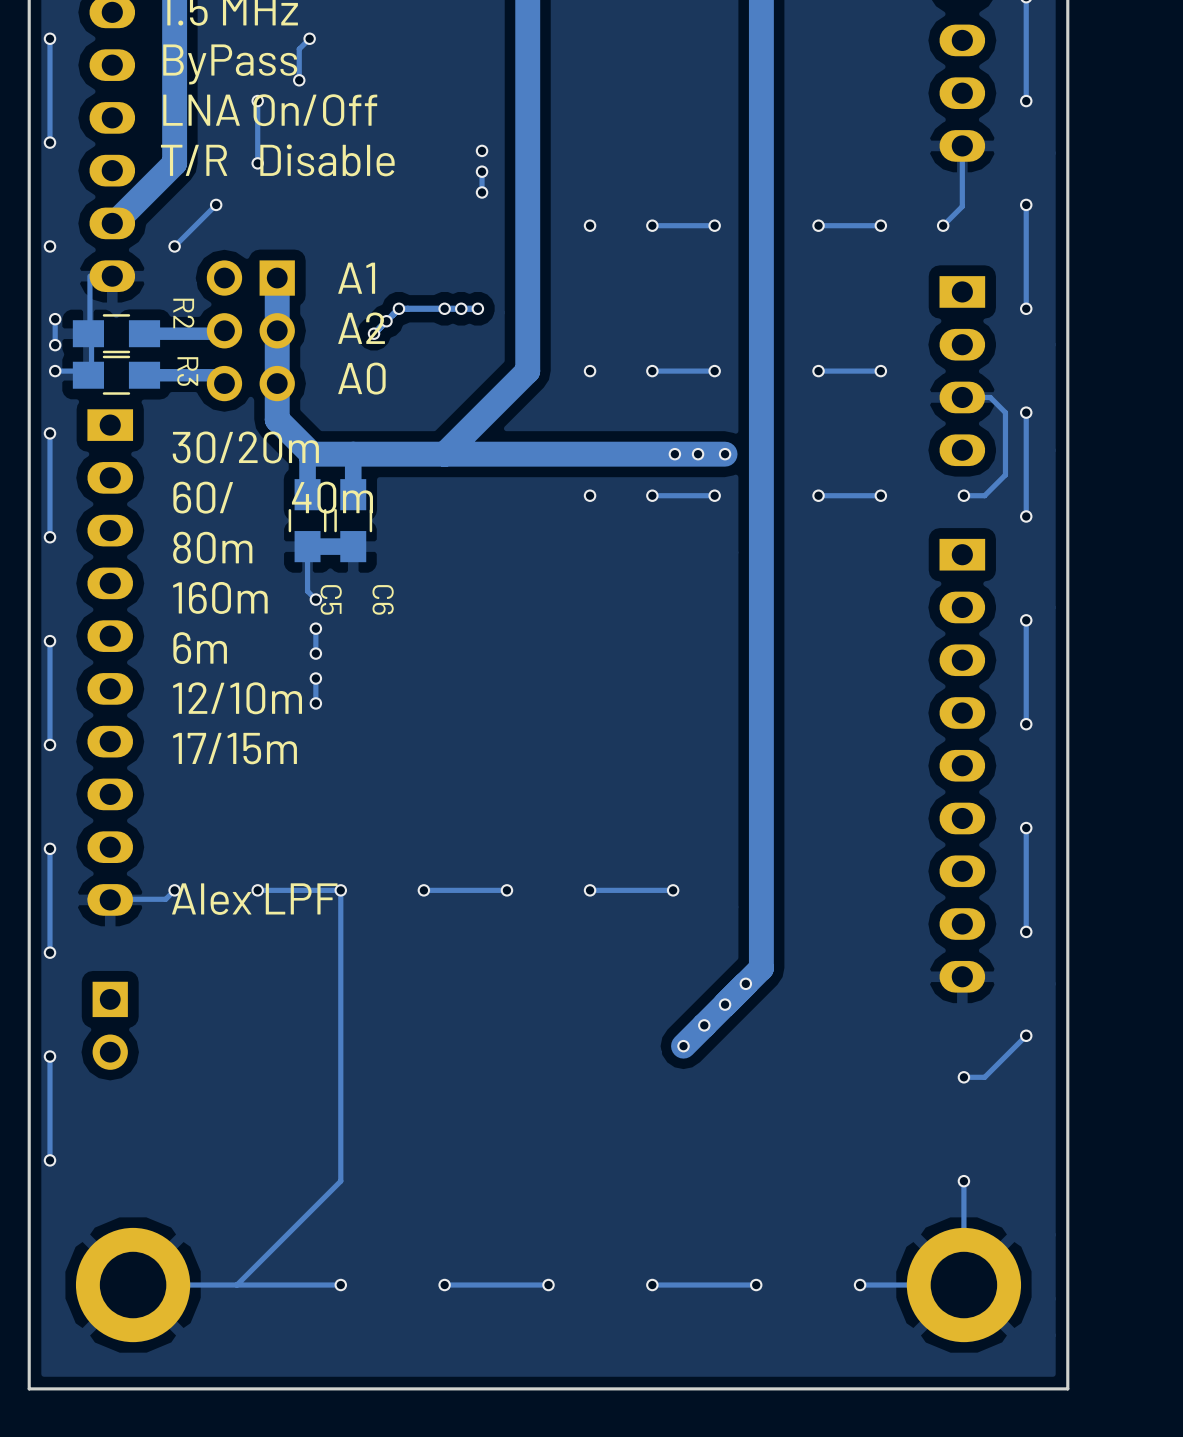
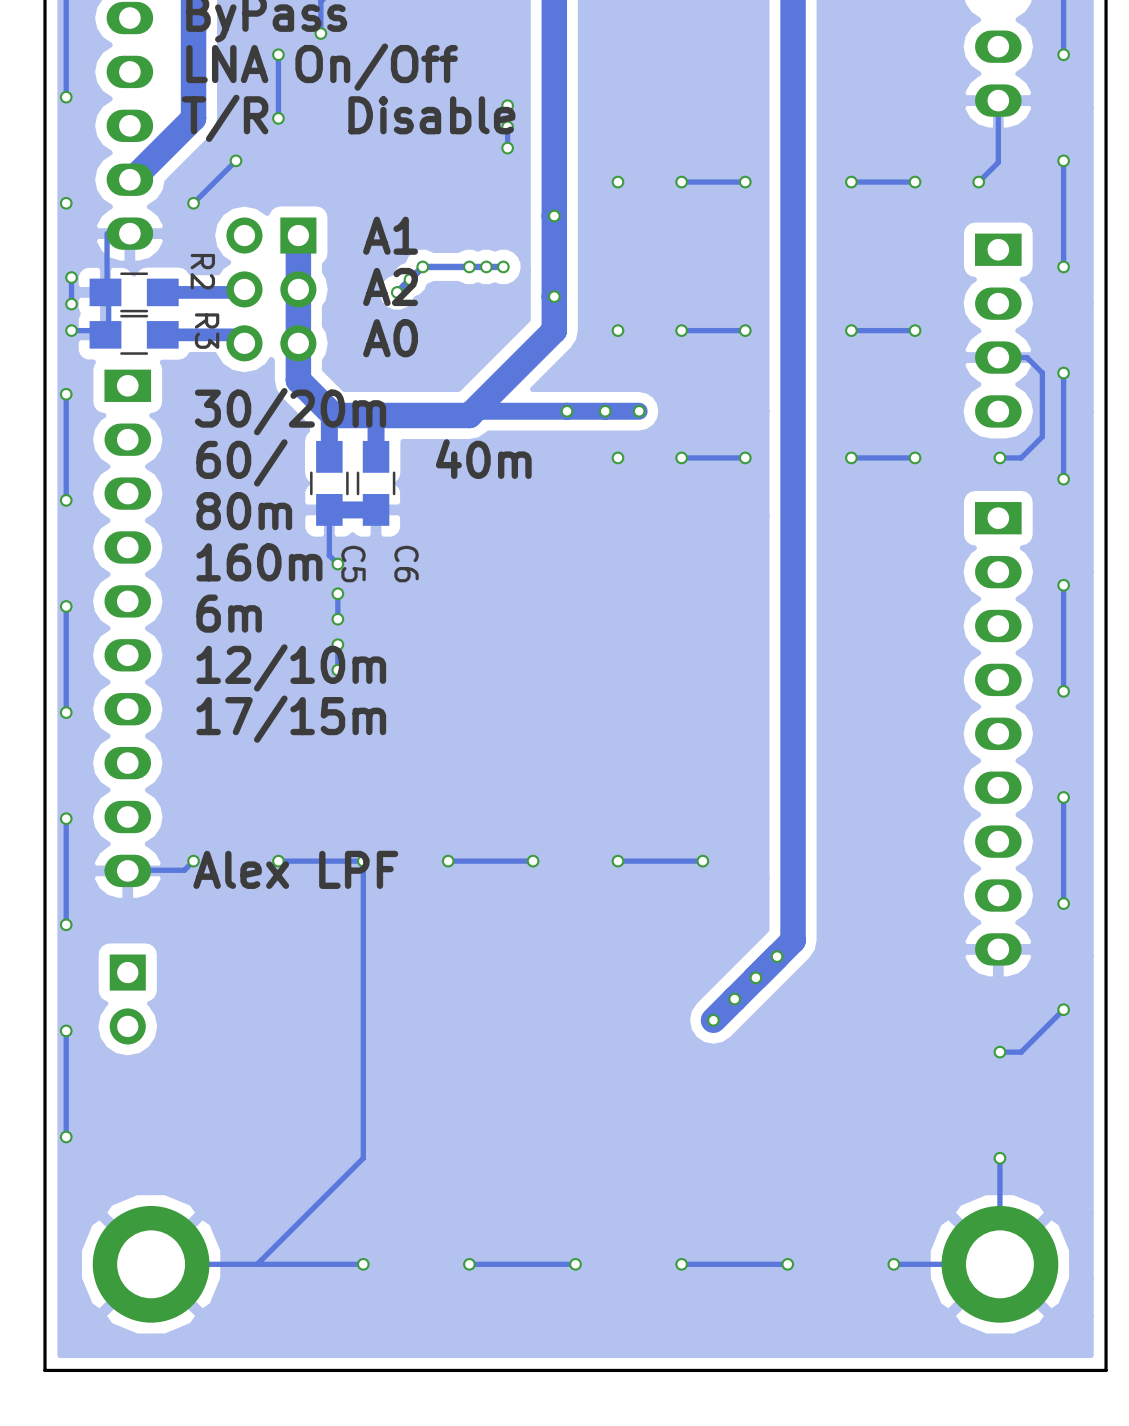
via: none -> (554, 216)
via: none -> (554, 296)
via: none -> (567, 411)
via: none -> (605, 411)
via: none -> (639, 411)
via: (674, 454) -> none
via: (698, 454) -> none
track: (725, 454) (444, 454) -> (639, 411) (473, 411) (469, 415)
via: (725, 454) -> none

